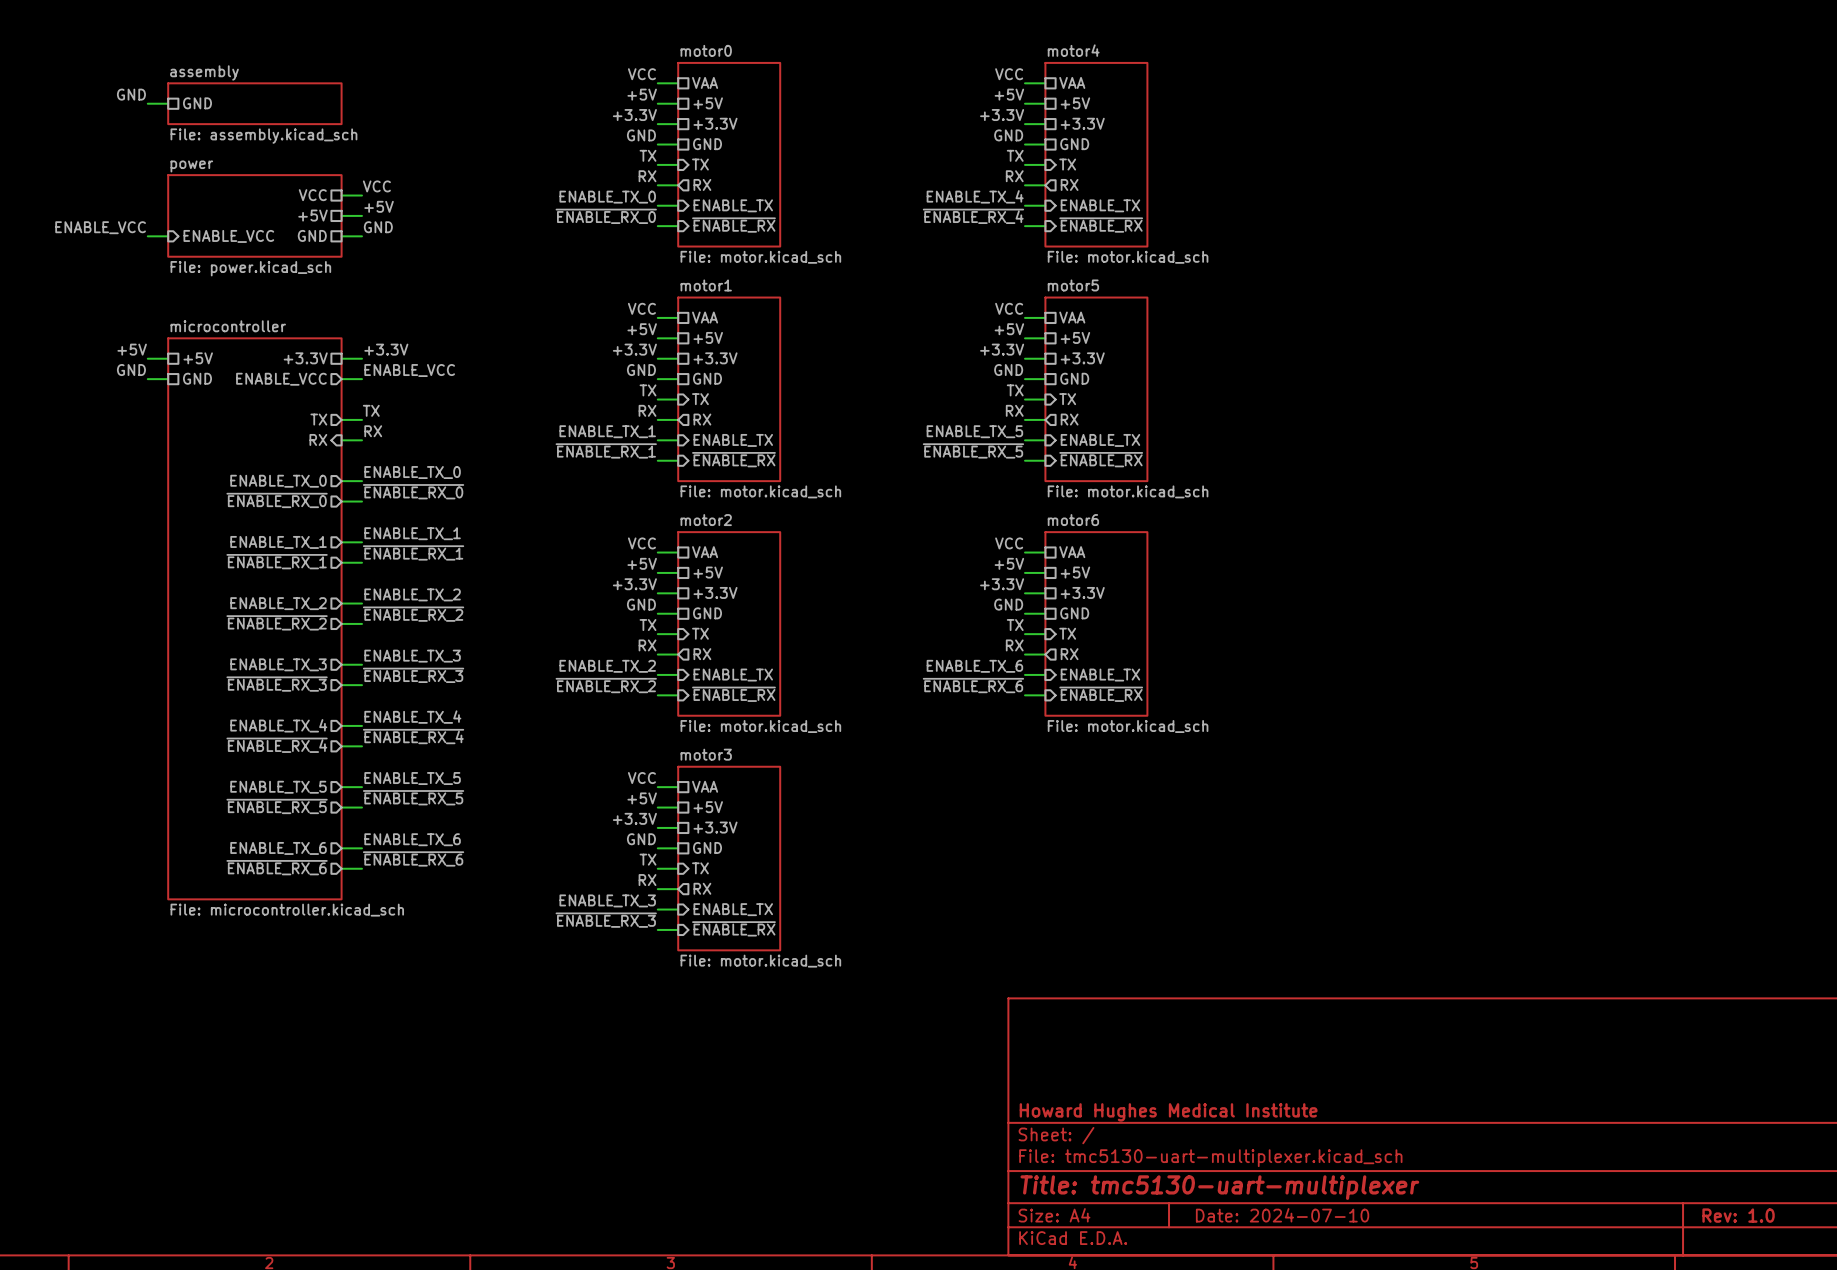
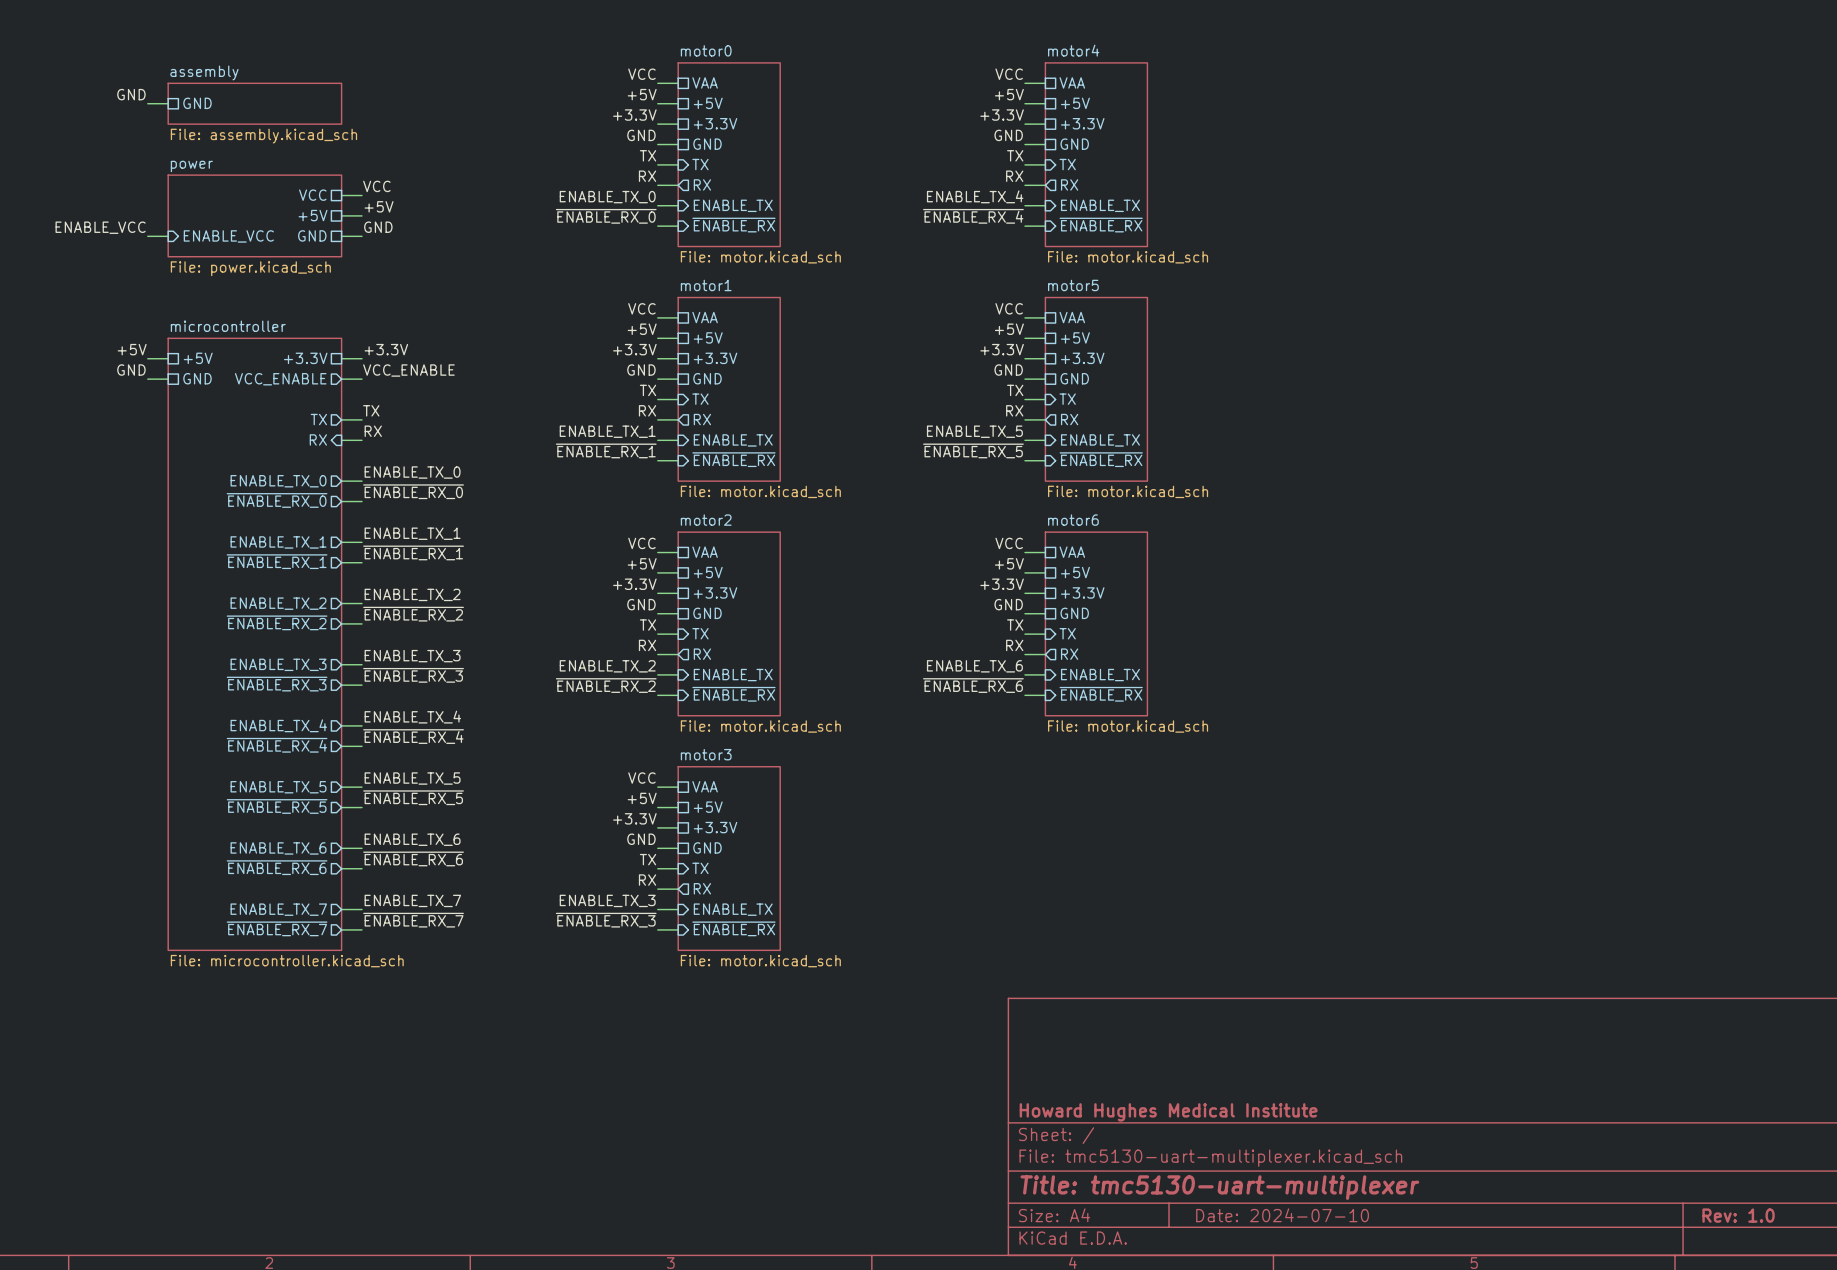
label: ENABLE_VCC (409, 370) -> VCC_ENABLE (408, 370)
sheet pin: ENABLE_VCC (281, 379) -> VCC_ENABLE (280, 379)
sheet microcontroller: File: microcontroller.kicad_sch (254, 618) -> none
sheet microcontroller: none -> File: microcontroller.kicad_sch (254, 644)
label: none -> ENABLE_TX_7 (412, 900)
sheet pin: none -> ENABLE_TX_7 (278, 909)
wire: none -> (341, 909) (361, 909)
label: none -> ~{ENABLE_RX_7} (413, 920)
sheet pin: none -> ~{ENABLE_RX_7} (277, 928)
wire: none -> (341, 929) (361, 929)

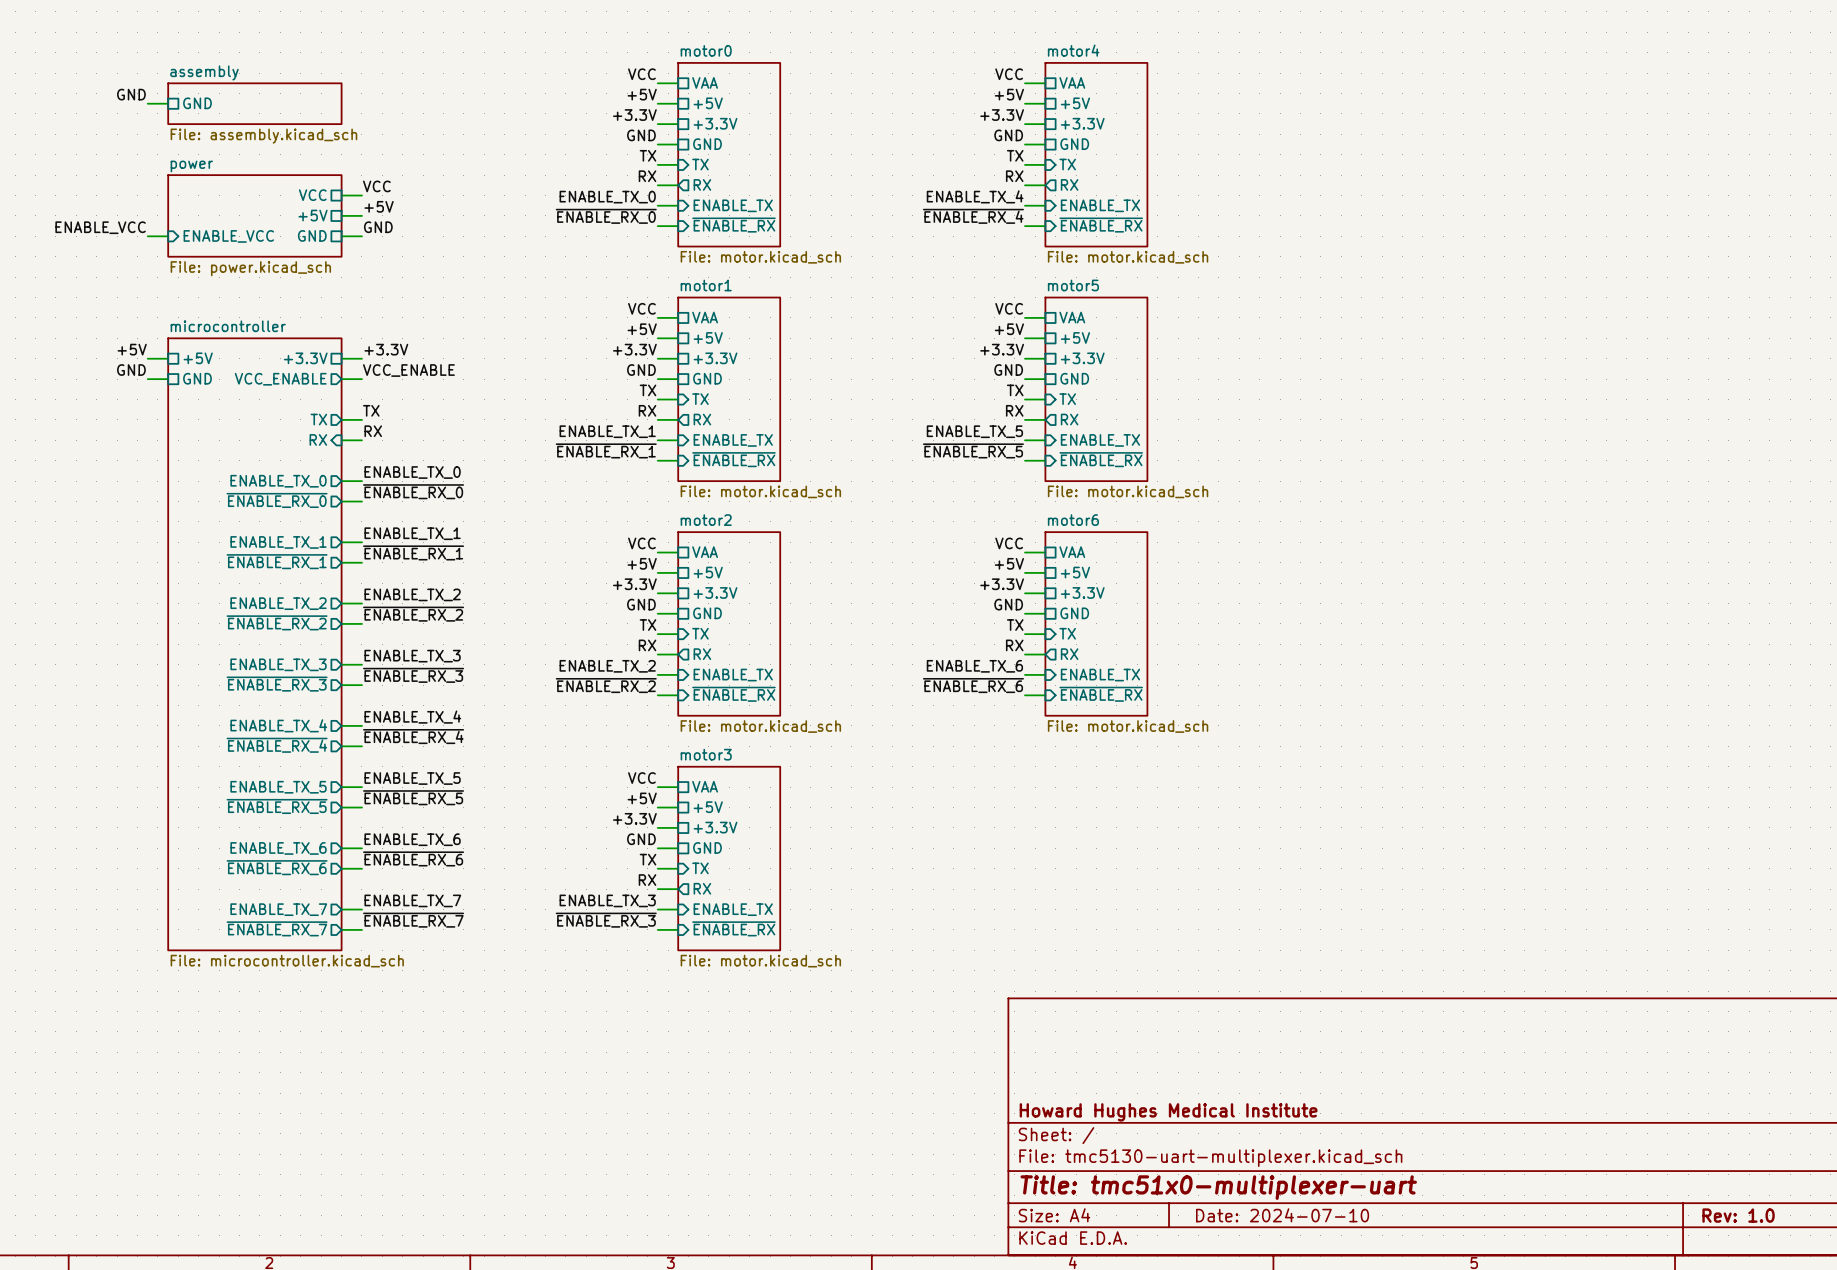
title block: Title: tmc5130-uart-multiplexer (1219, 1187) -> Title: tmc51x0-multiplexer-uart (1218, 1187)

